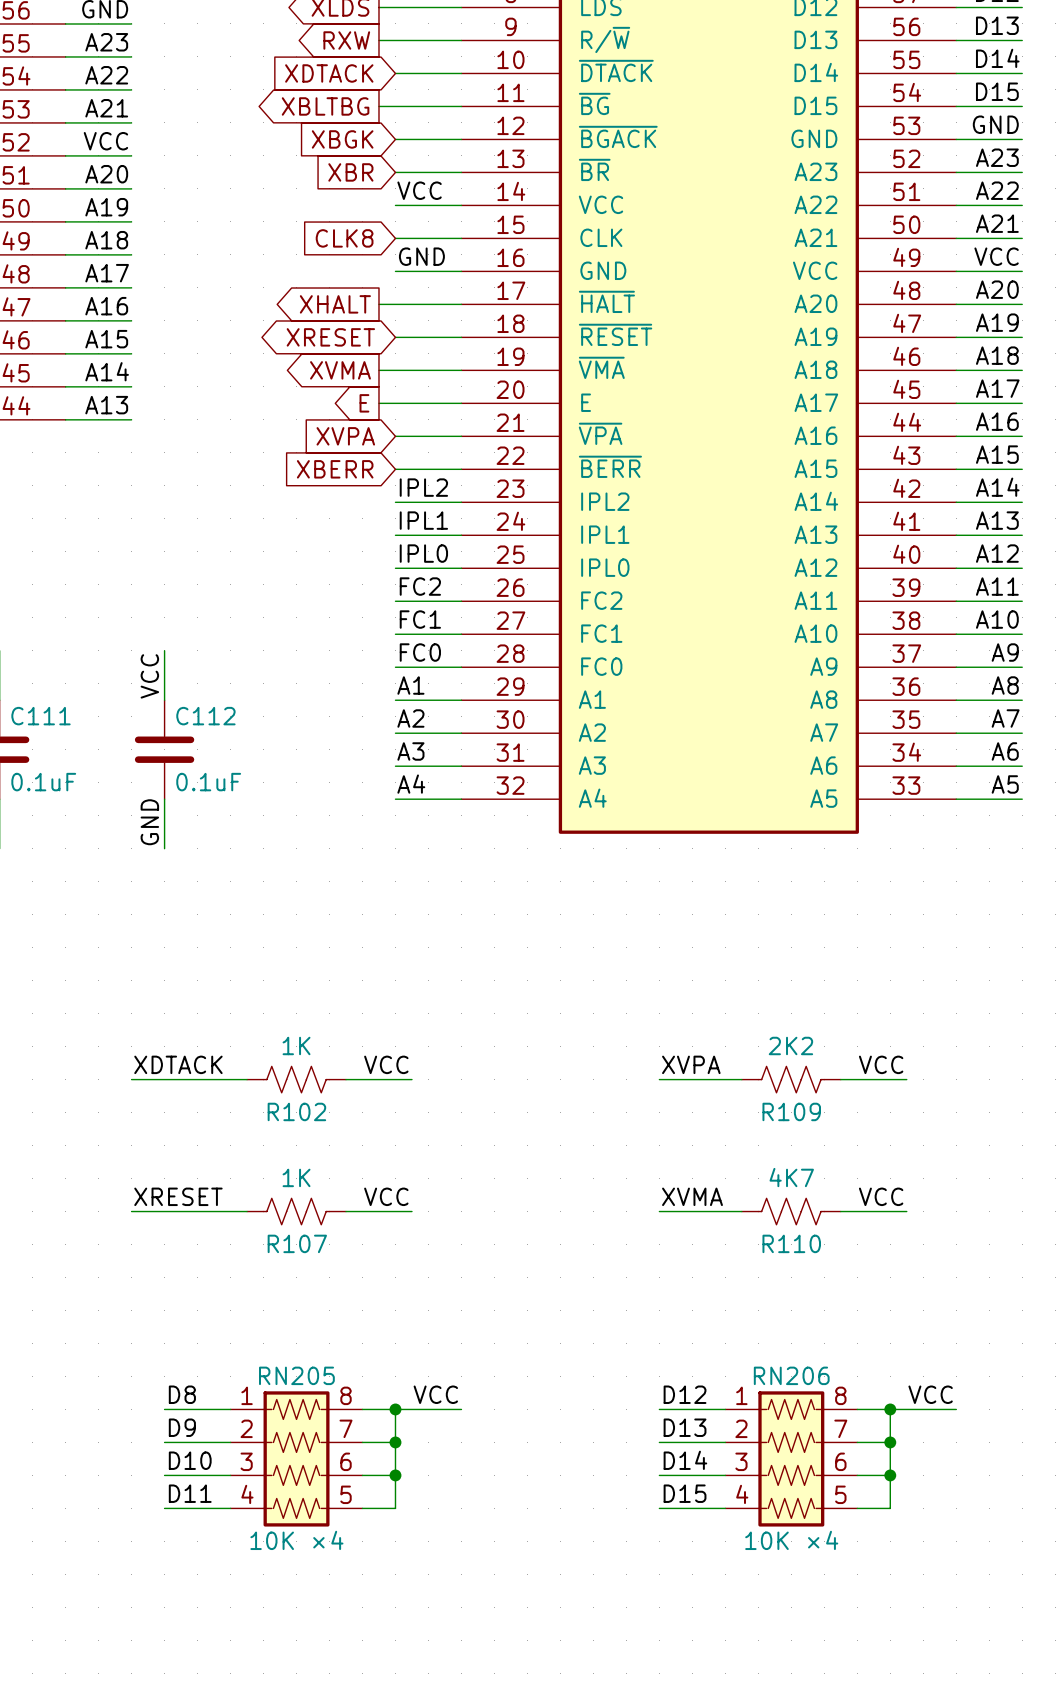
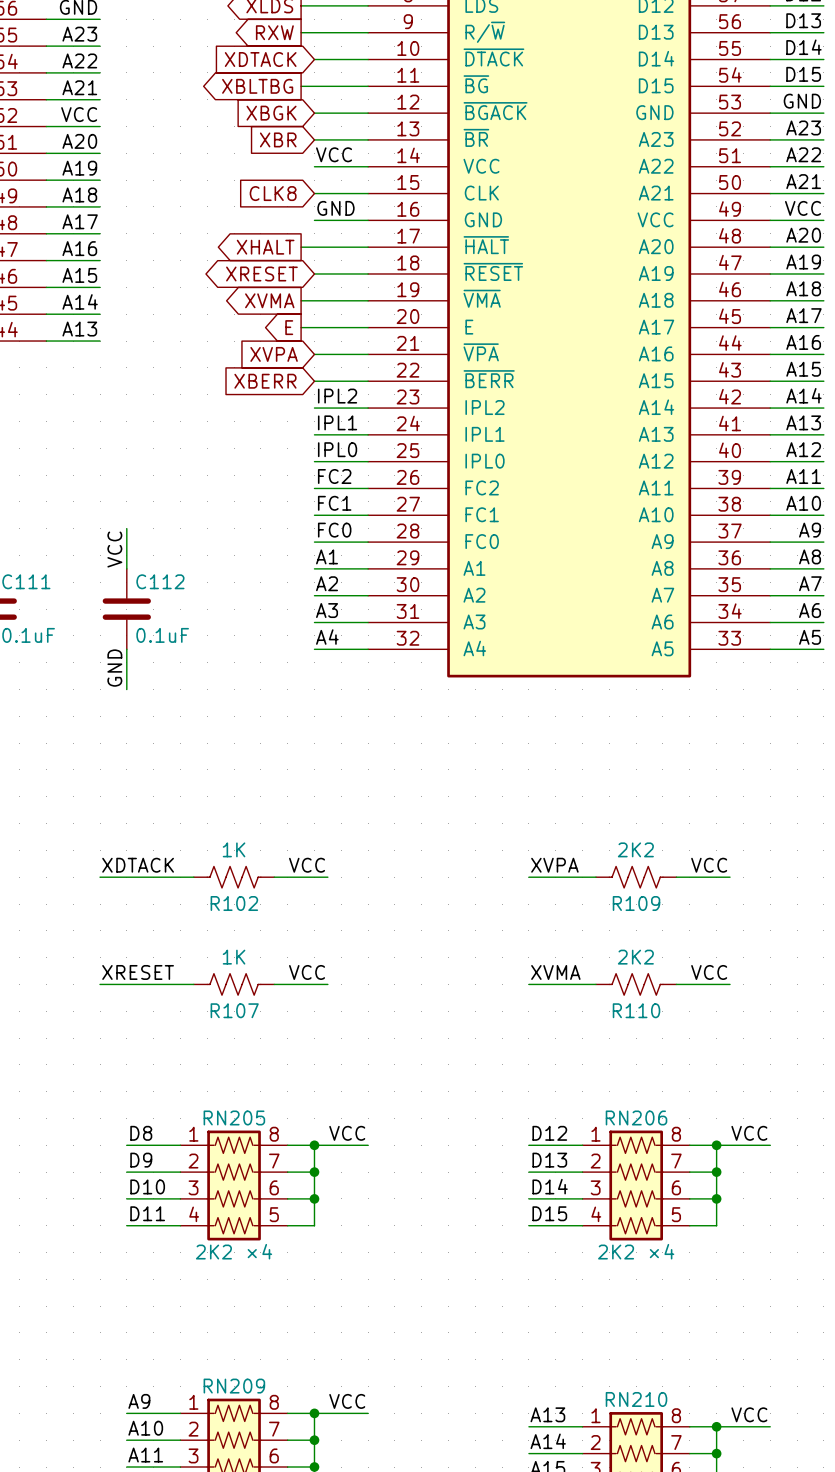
R110 value: 4K7 (791, 1177) -> 2K2 (635, 957)
RN205 value: 10K ×4 (296, 1540) -> 2K2 ×4 (234, 1251)
RN206 value: 10K ×4 (791, 1540) -> 2K2 ×4 (636, 1251)

